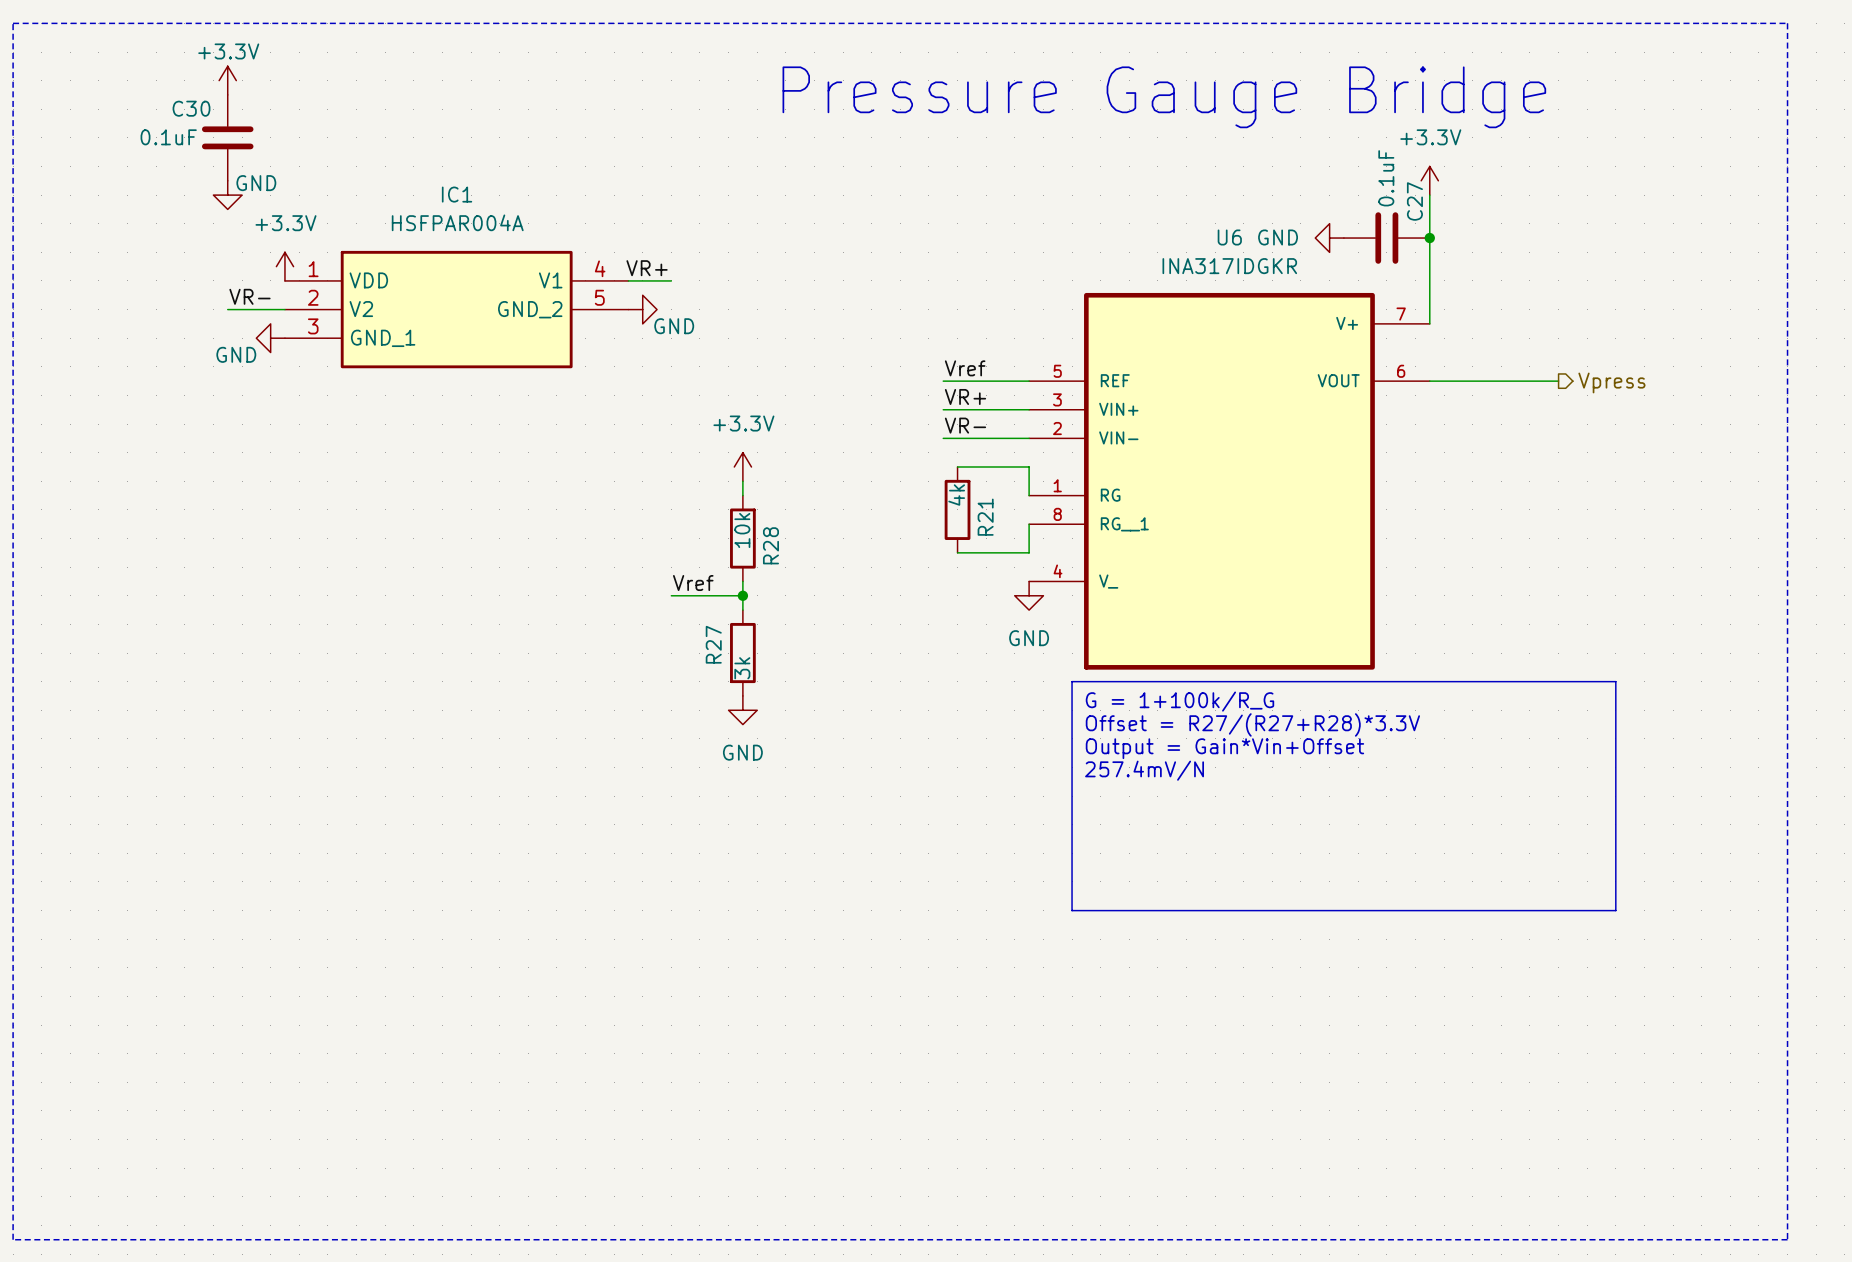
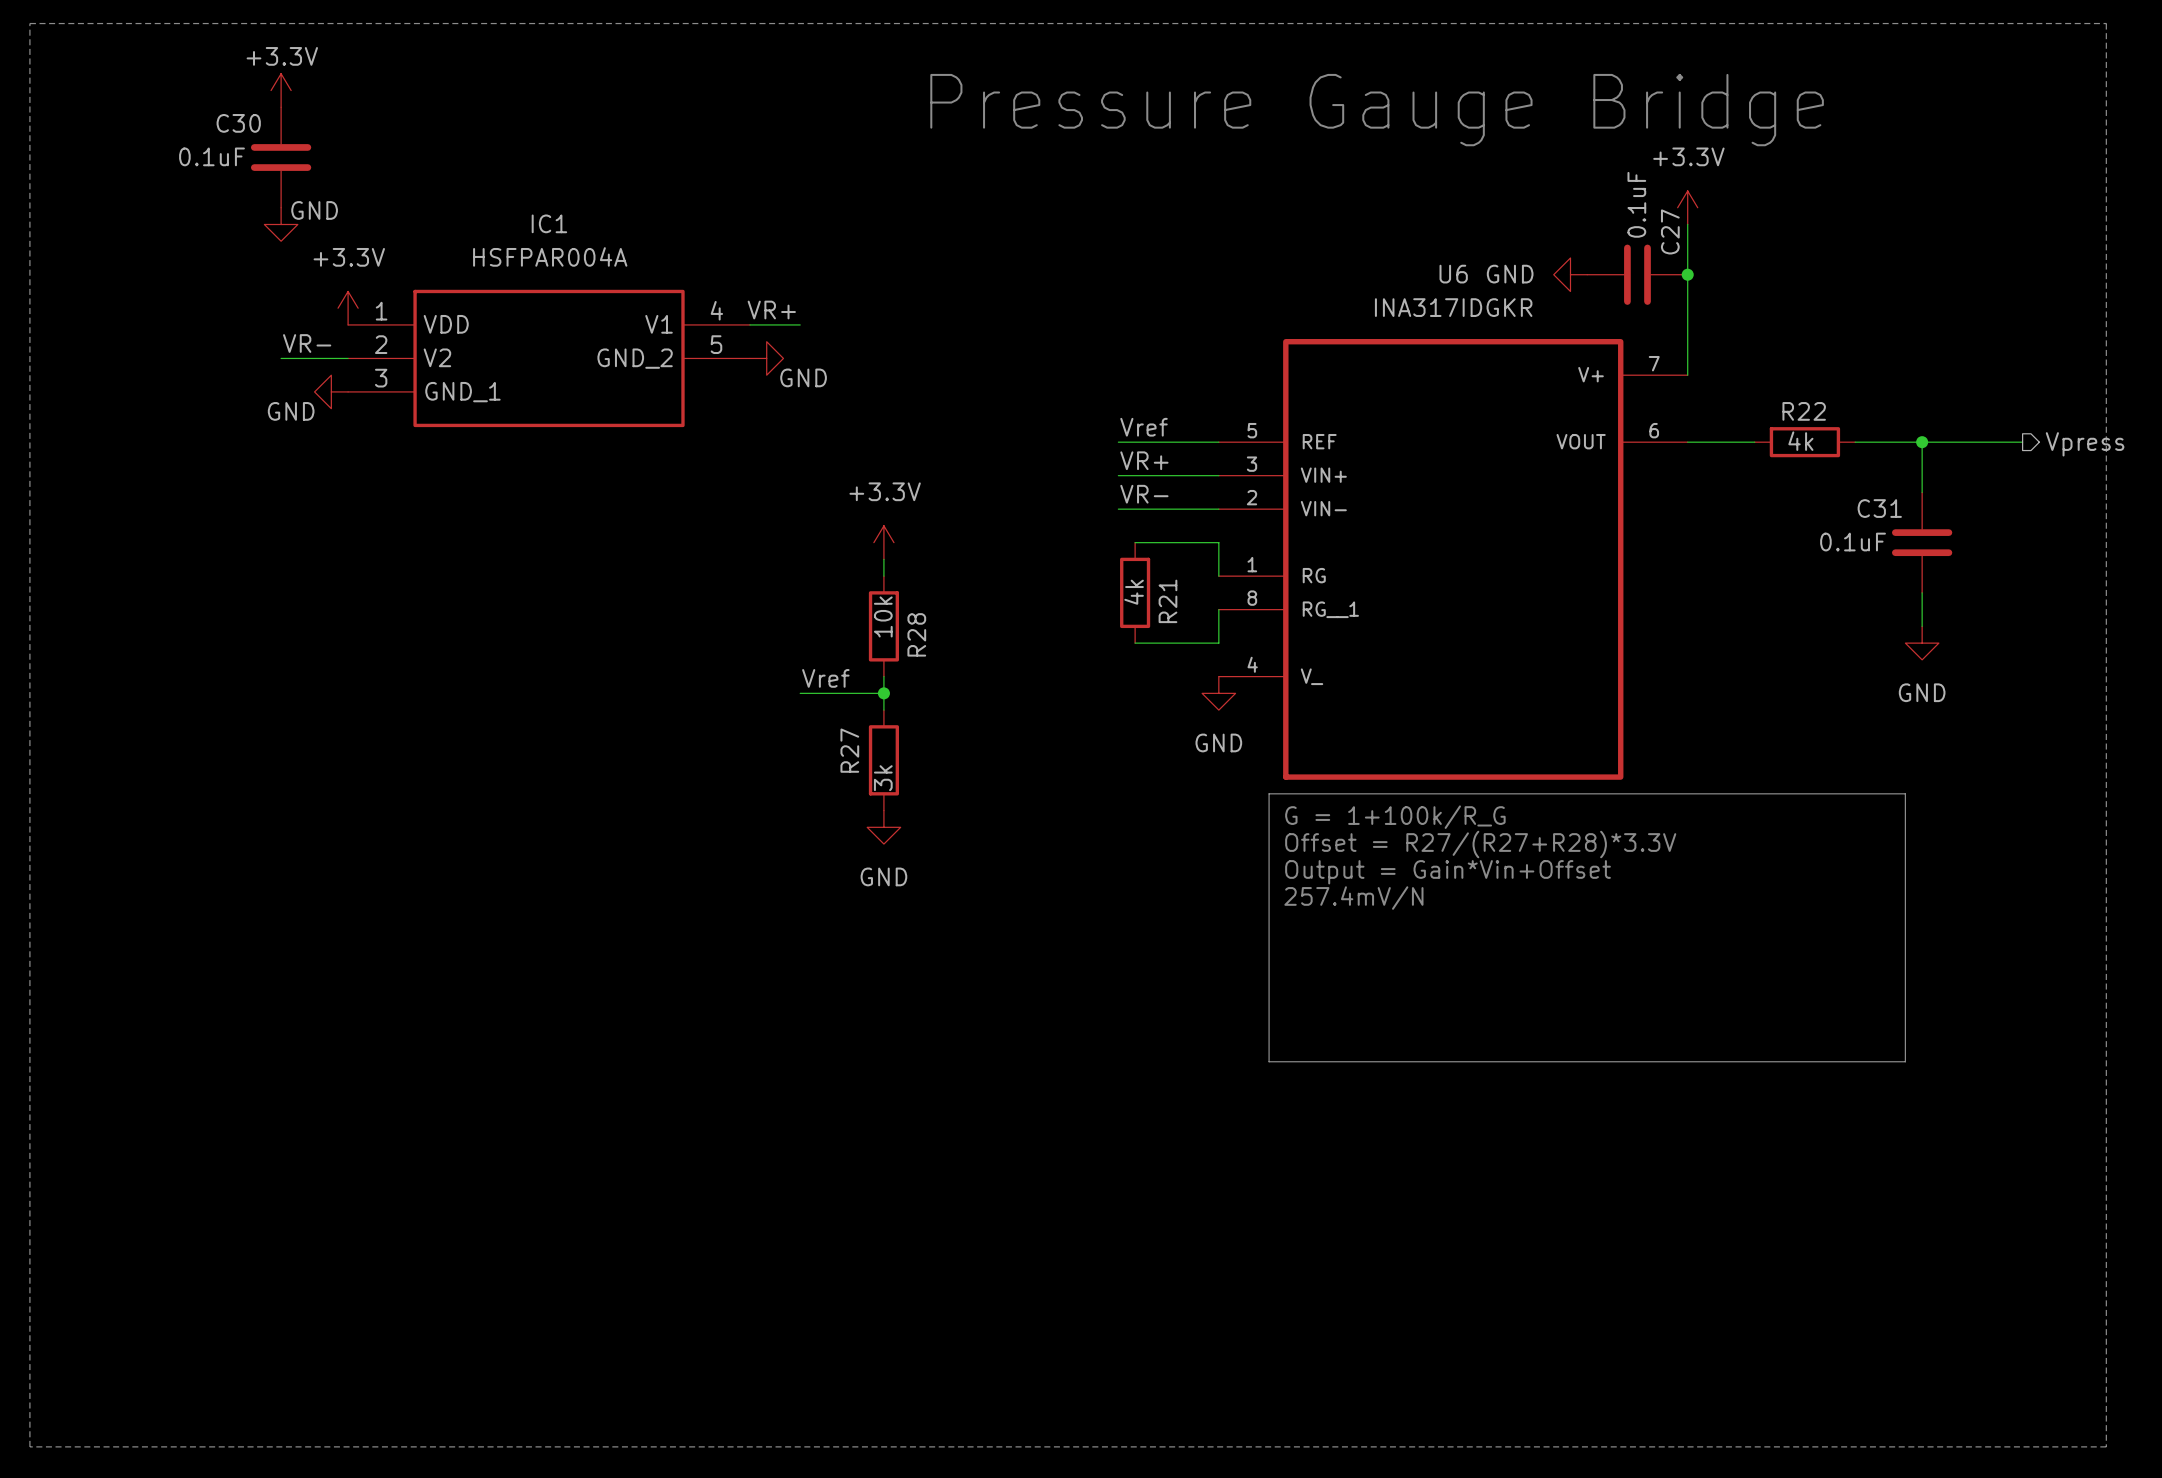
wire: (1487, 381) (1558, 381) -> none
R22: none -> 4k (1804, 442)
wire: none -> (1855, 442) (2022, 442)
wire: none -> (1922, 442) (1922, 492)
junction: none -> (1922, 442)
hierarchical label position: Vpress (1611, 382) -> Vpress (2085, 444)
C31: none -> 0.1uF (1922, 542)
R21 value position: 4k (956, 495) -> 4k (1134, 592)
wire: none -> (1922, 592) (1922, 626)
power symbol: none -> GND (1922, 643)

